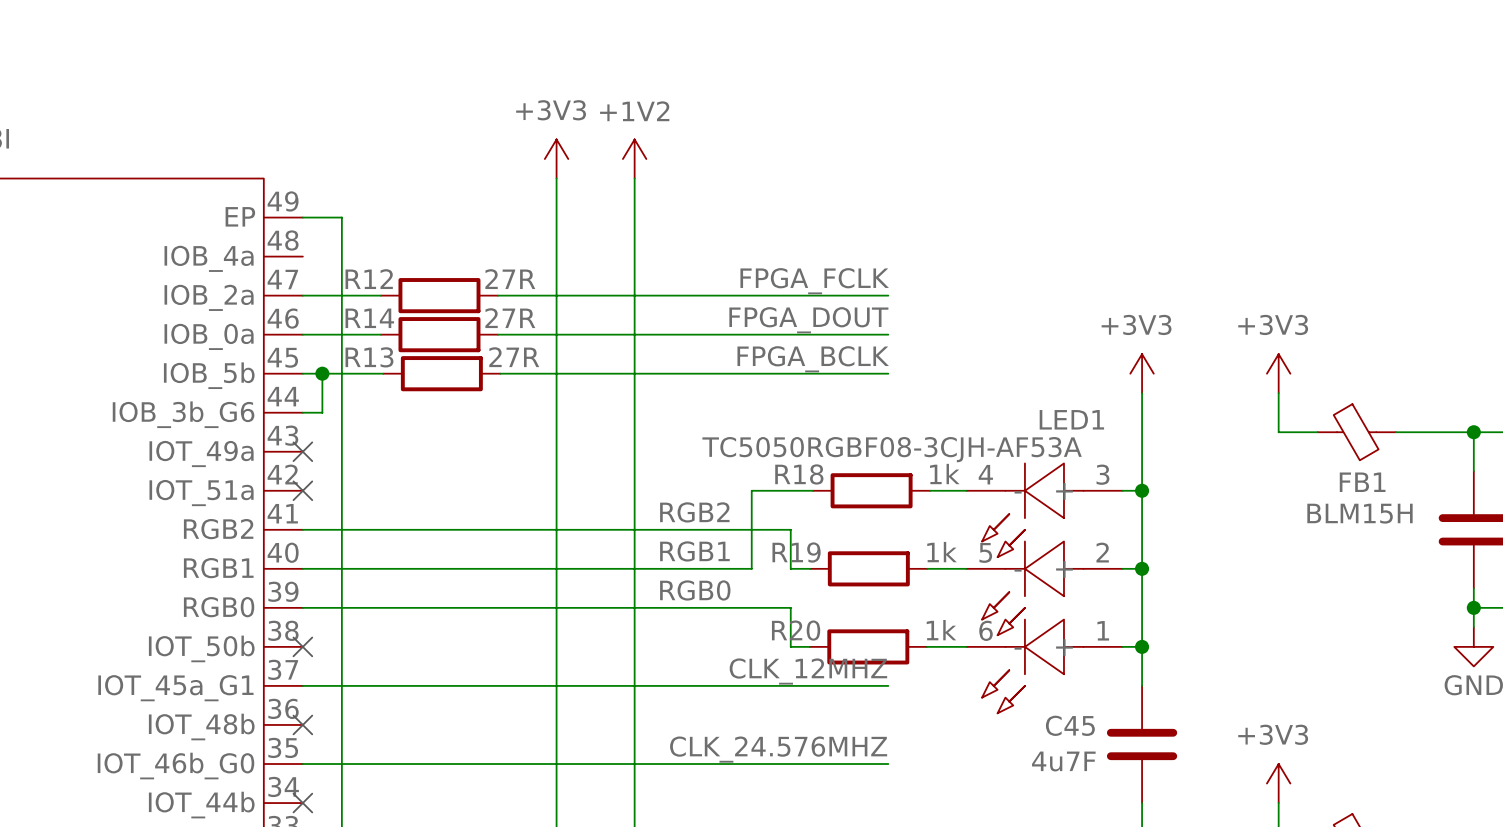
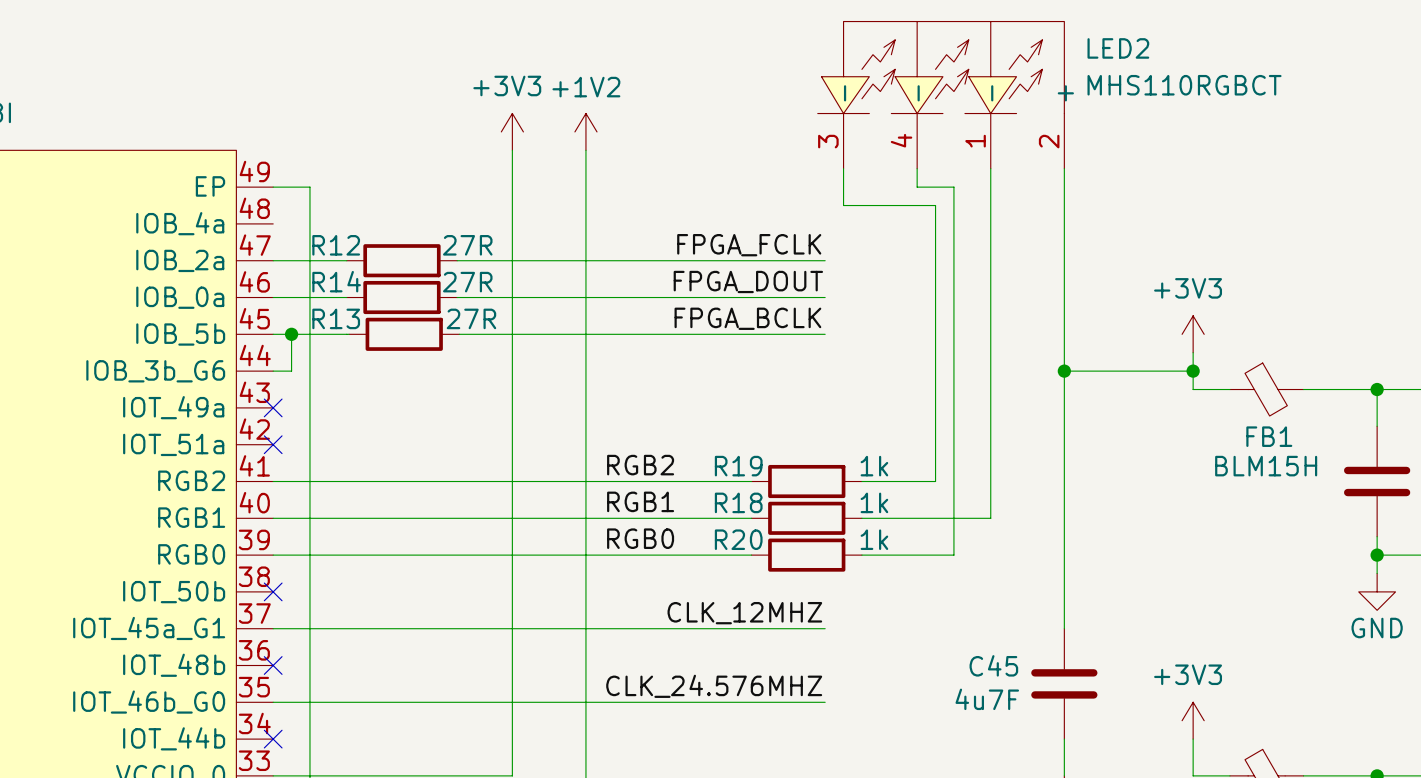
LED2: none -> MHS110RGBCT (941, 95)
wire: none -> (843, 168) (843, 205) (935, 205) (935, 481) (861, 481)
wire: none -> (917, 168) (917, 187) (953, 187) (953, 555) (861, 555)
wire: none -> (990, 168) (990, 518) (898, 518)
wire: none -> (1064, 168) (1064, 352)
power symbol: +3V3 (1142, 373) -> none
wire: none -> (1064, 371) (1193, 371)
junction: none -> (1064, 371)
junction: none -> (1193, 371)
wire: (813, 490) (751, 490) (751, 568) -> (733, 518) (696, 518)
R18: 1k (871, 490) -> none
wire: (930, 490) (966, 490) -> none
wire: (1122, 490) (1142, 490) -> none
junction: (1142, 490) -> none
wire: (790, 529) (790, 568) -> (733, 481) (751, 481)
R19: none -> 1k (806, 481)
R19 name: R19 (796, 552) -> R18 (738, 502)
wire: (1122, 568) (1142, 568) -> none
junction: (1142, 568) -> none
LED1: TC5050RGBF08-3CJH-AF53A (1044, 588) -> none
wire: (790, 607) (790, 646) (809, 646) -> (733, 555) (751, 555)
R20 position: (868, 646) -> (806, 555)
wire: (926, 646) (966, 646) -> none
wire: (1122, 646) (1142, 646) -> none
junction: (1142, 646) -> none

